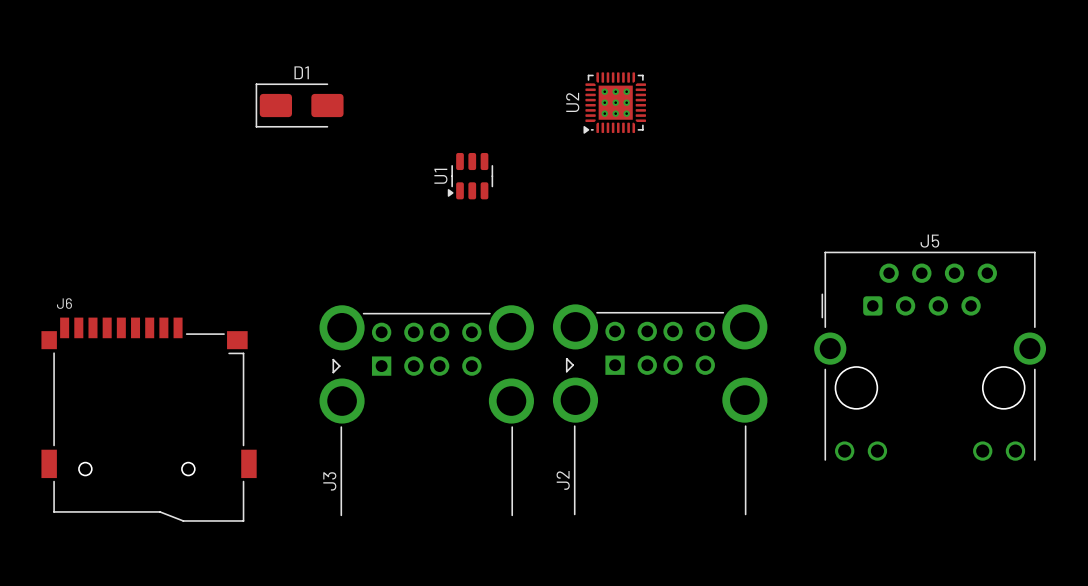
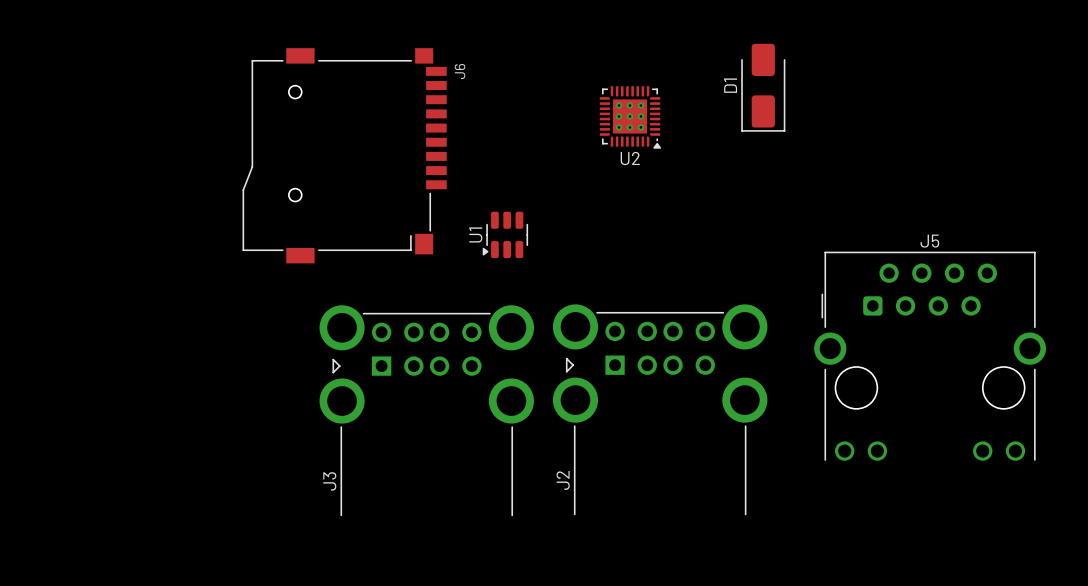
U2 rotation: 0° (614, 103) -> 90° counterclockwise (630, 117)
D1 rotation: 0° (299, 105) -> 90° counterclockwise (763, 87)
D1 position: (299, 105) -> (763, 87)
U1 position: (470, 176) -> (505, 234)
J6 rotation: 0° (149, 419) -> 90° clockwise (344, 155)
J6 position: (149, 419) -> (344, 155)

